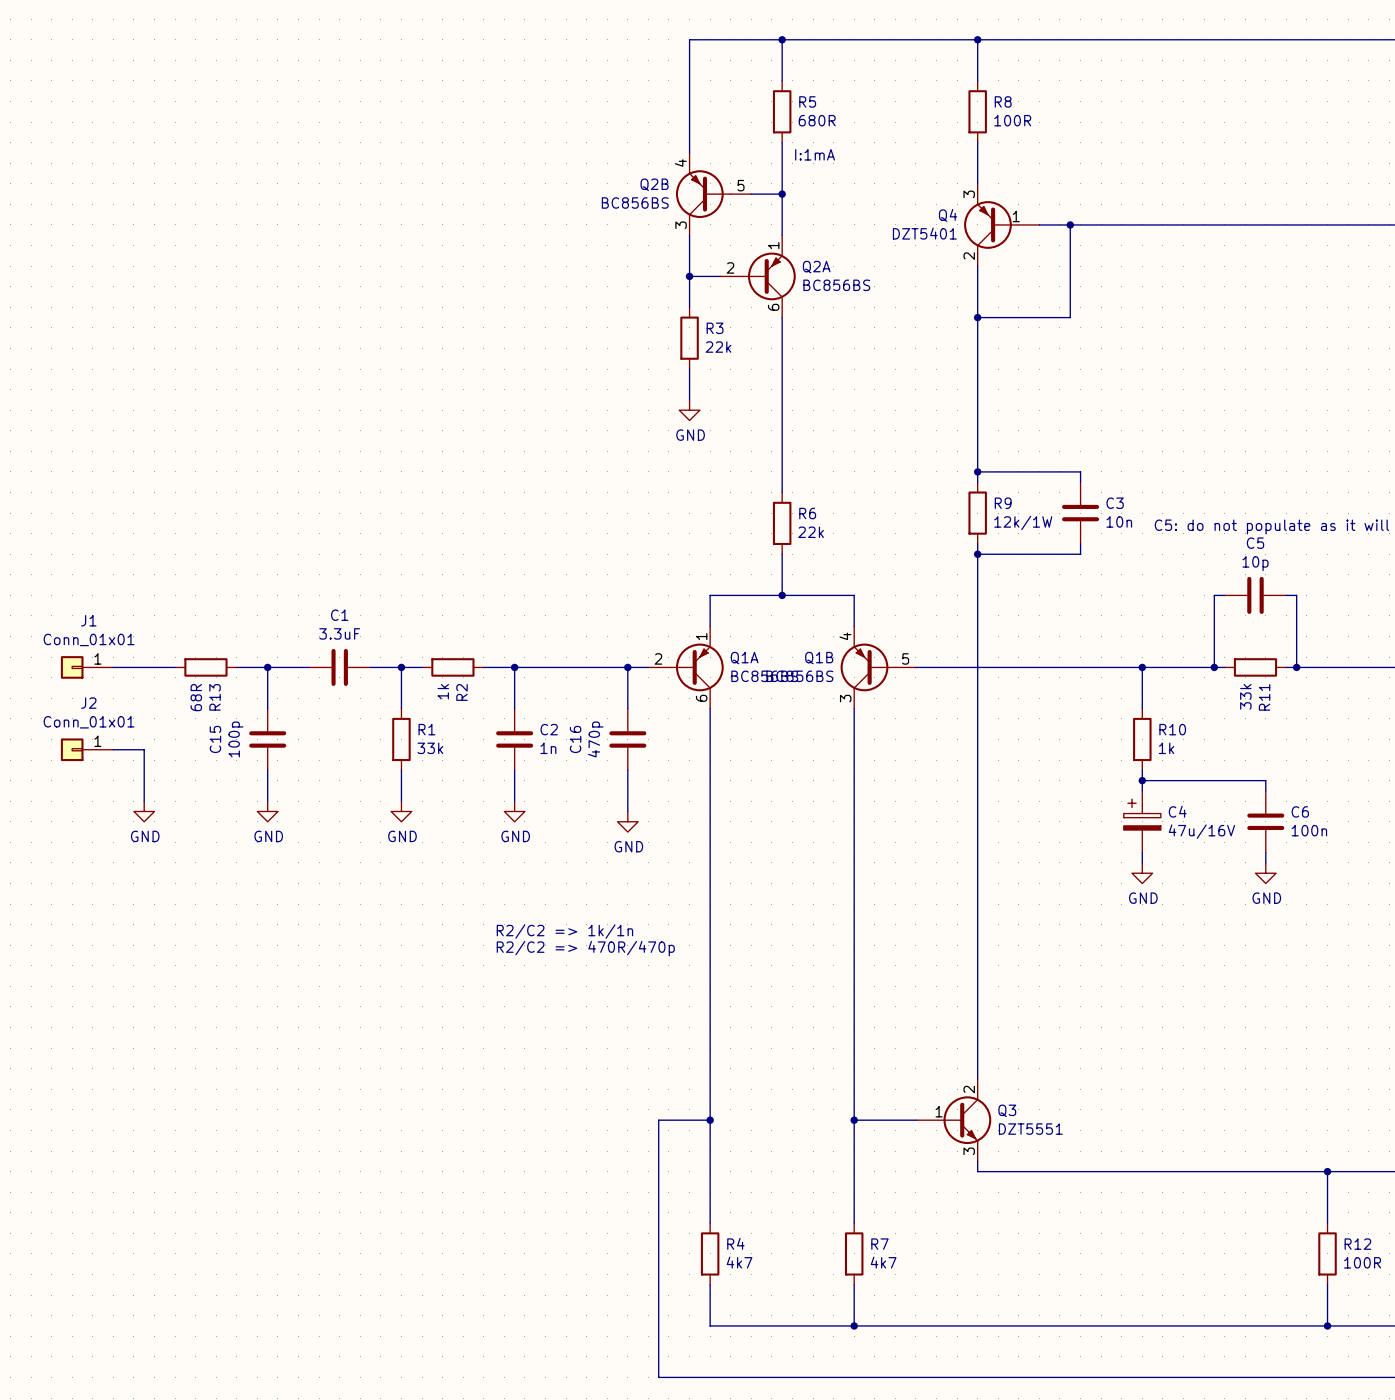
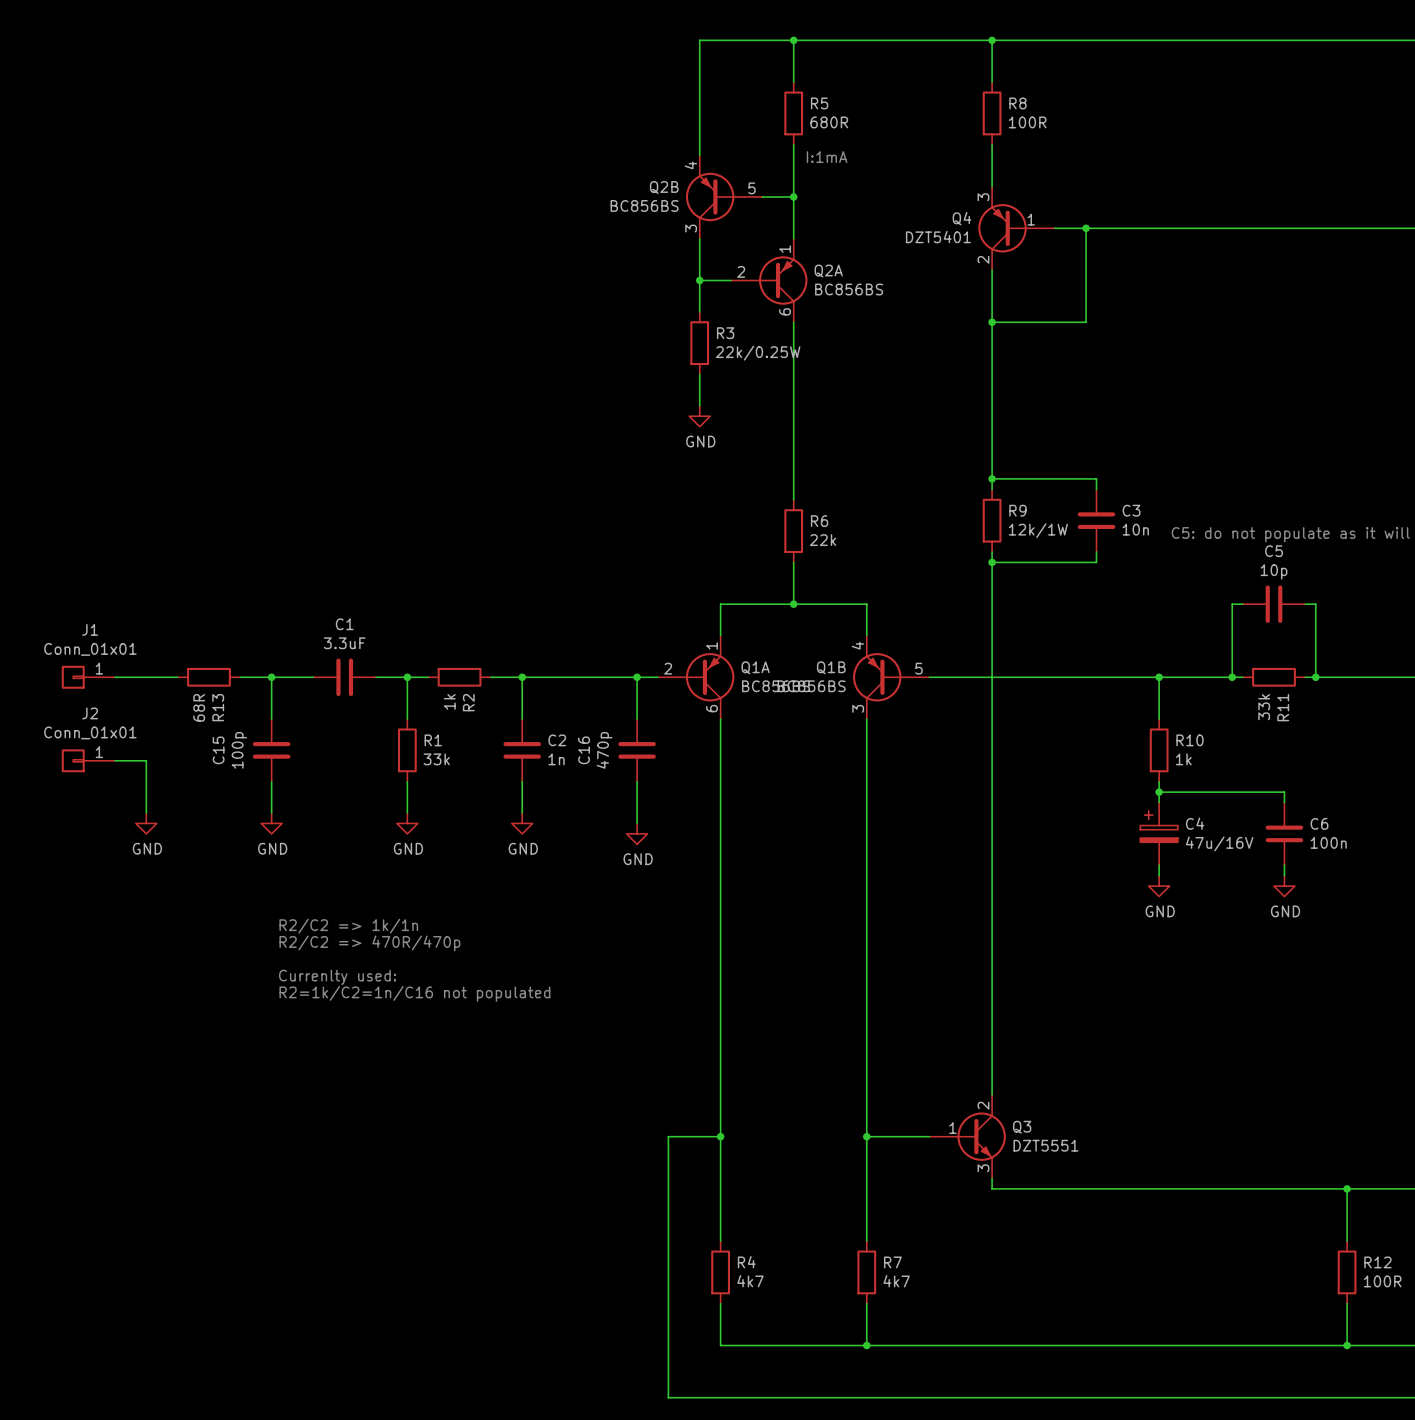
R3 value: 22k (718, 347) -> 22k/0.25W (758, 353)
text: none -> R2/C2 => 1k/1n (348, 926)
text: none -> R2/C2 => 470R/470p (369, 943)
text: R2/C2 => 1k/1n (564, 931) -> none
text: R2/C2 => 470R/470p (585, 948) -> none
text: none -> Currenlty used: (337, 977)
text: none -> R2=1k/C2=1n/C16 not populated (414, 993)

